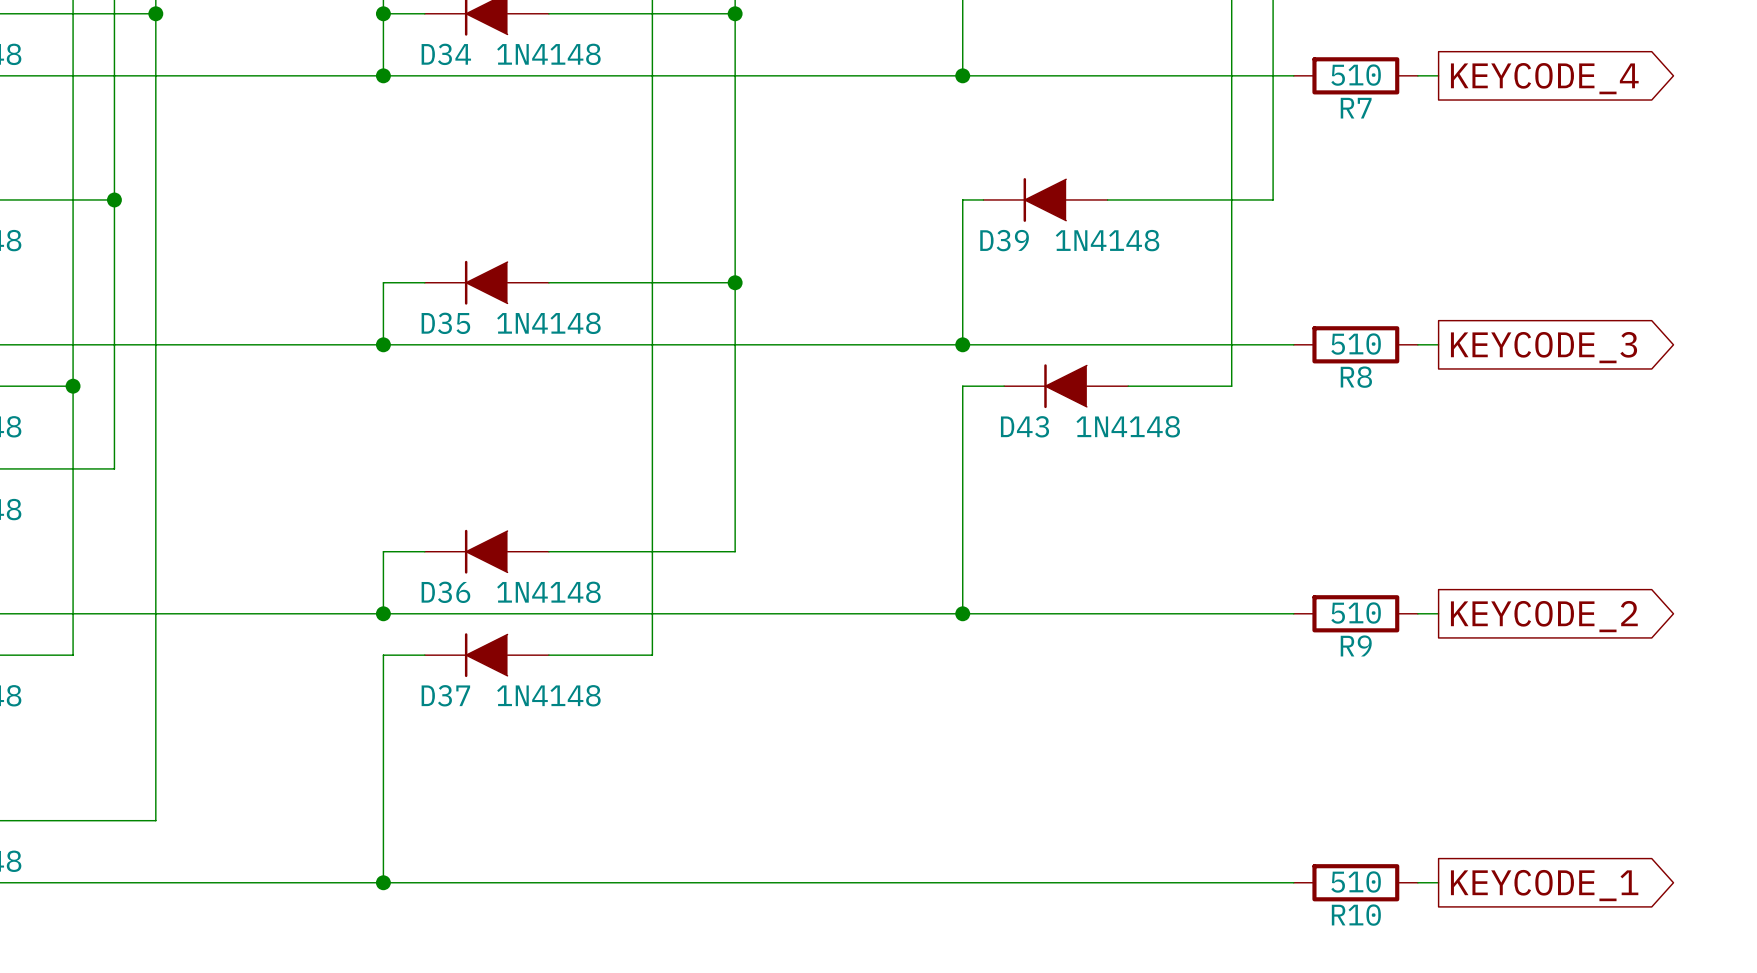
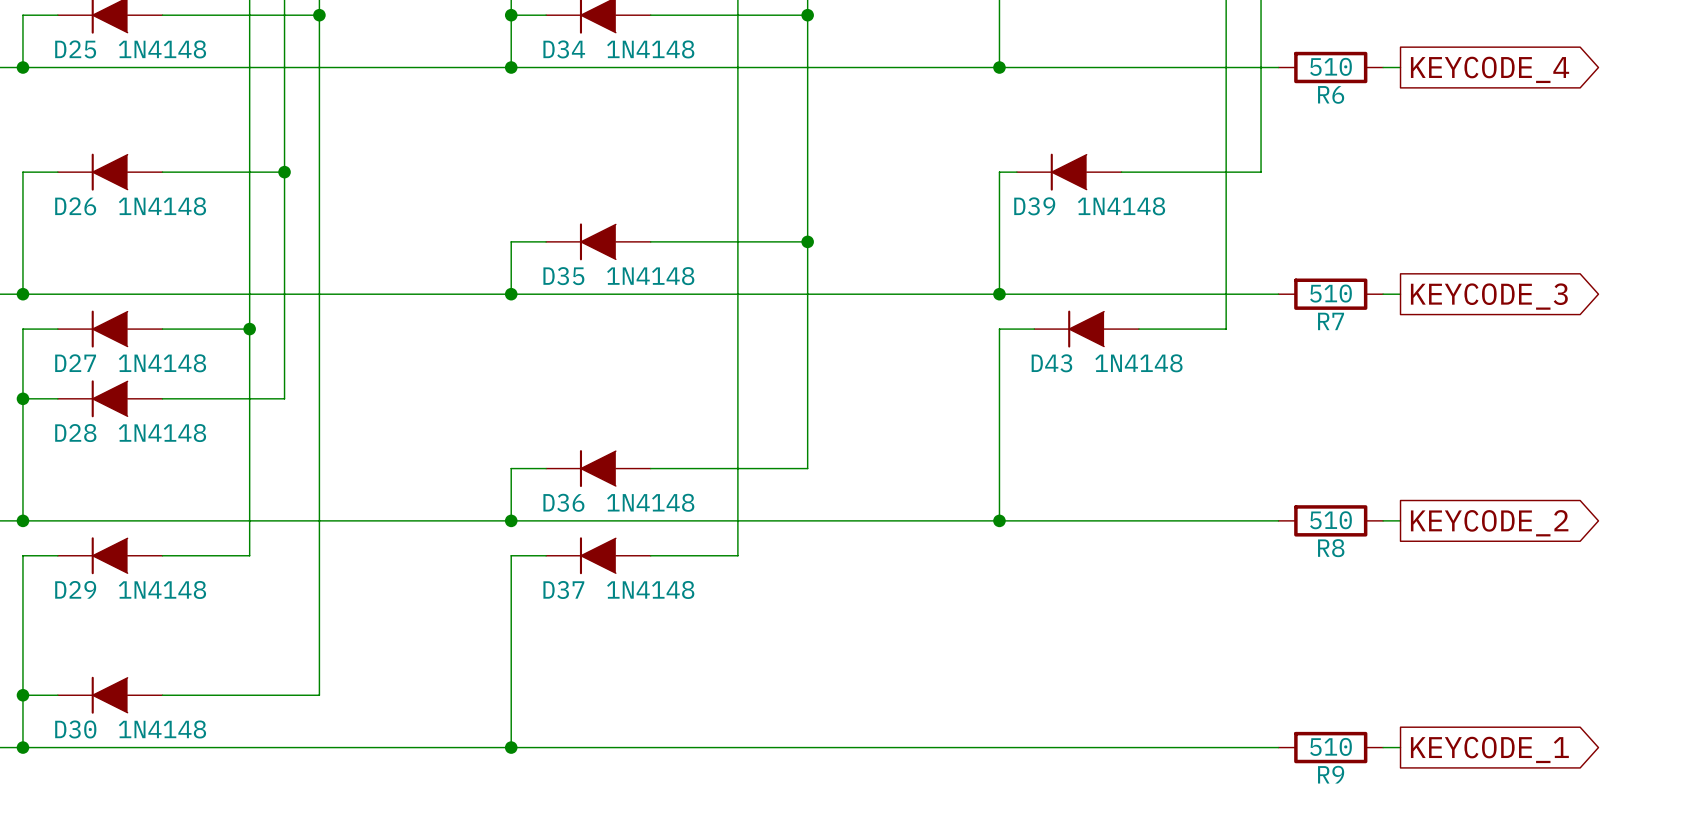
R7 name: R7 (1356, 108) -> R6 (1331, 94)
R8 name: R8 (1356, 377) -> R7 (1331, 321)
R9 name: R9 (1356, 645) -> R8 (1331, 548)
R10 name: R10 (1356, 915) -> R9 (1331, 774)

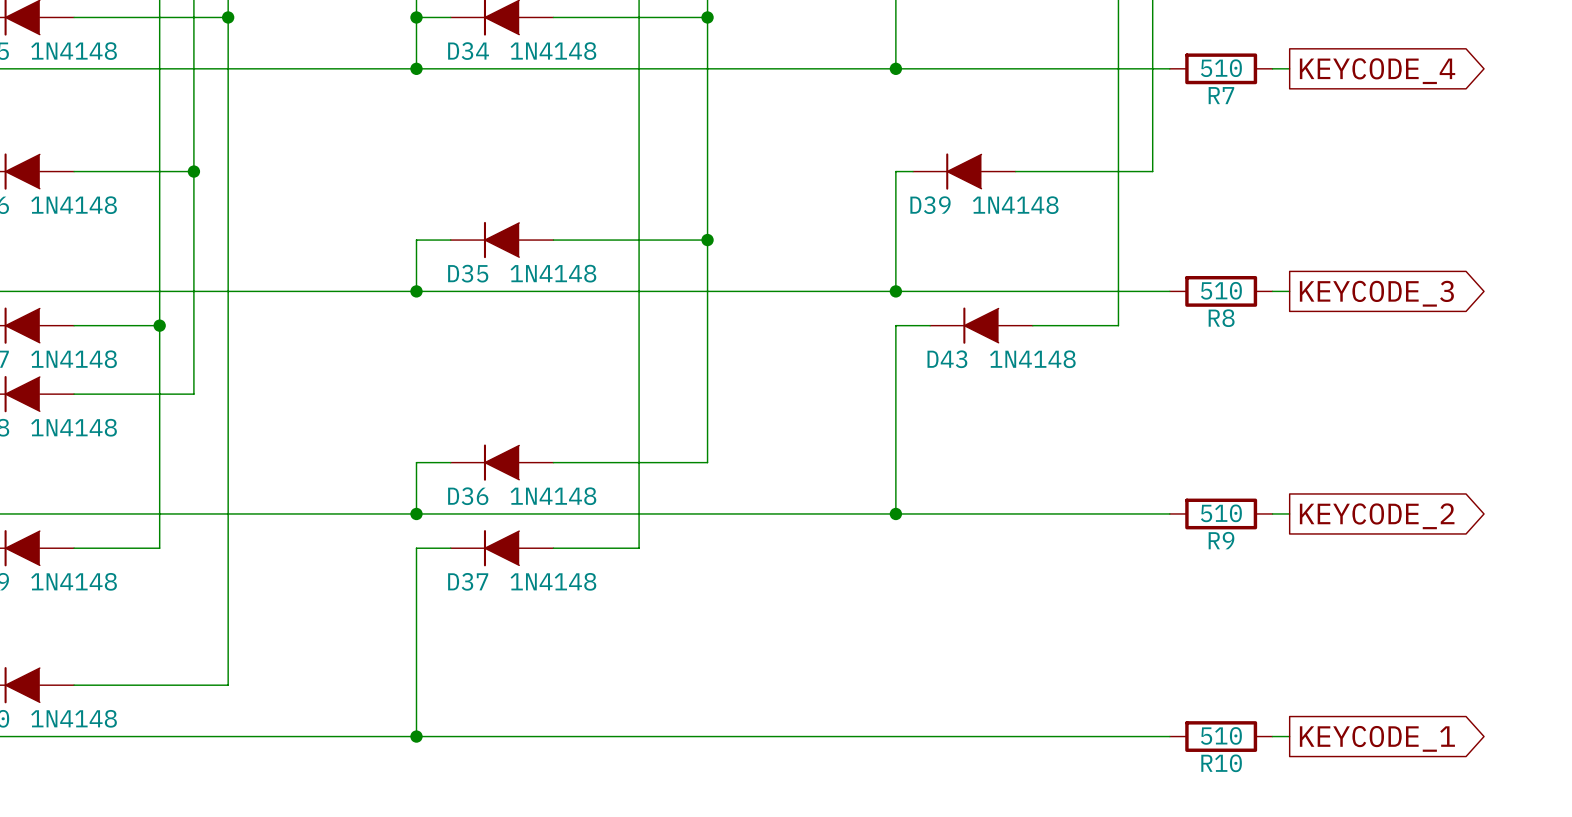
R6 name: R6 (1331, 94) -> R7 (1221, 95)
R7 name: R7 (1331, 321) -> R8 (1221, 318)
R8 name: R8 (1331, 548) -> R9 (1221, 540)
R9 name: R9 (1331, 774) -> R10 (1221, 763)

